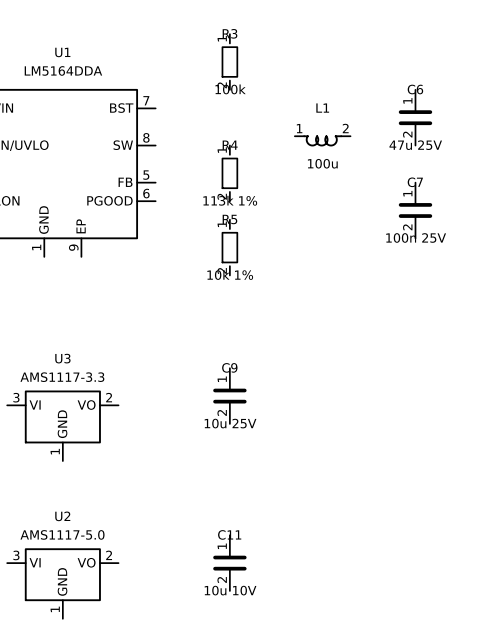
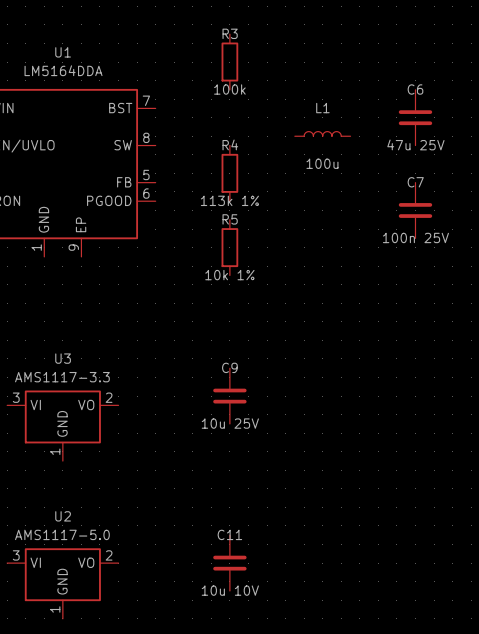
R3 symbol: [221, 34, 239, 90] -> [221, 34, 239, 90]
C6 symbol: [398, 89, 433, 146] -> [398, 89, 433, 146]
L1 symbol: [294, 135, 351, 147] -> [294, 131, 351, 137]
R4 symbol: [221, 145, 239, 202] -> [221, 145, 239, 202]
C7 symbol: [398, 182, 433, 239] -> [398, 182, 433, 239]
R5 symbol: [221, 219, 239, 276] -> [221, 219, 239, 276]
C9 symbol: [213, 368, 247, 424] -> [213, 368, 247, 424]
C11 symbol: [213, 535, 247, 591] -> [213, 535, 247, 591]

